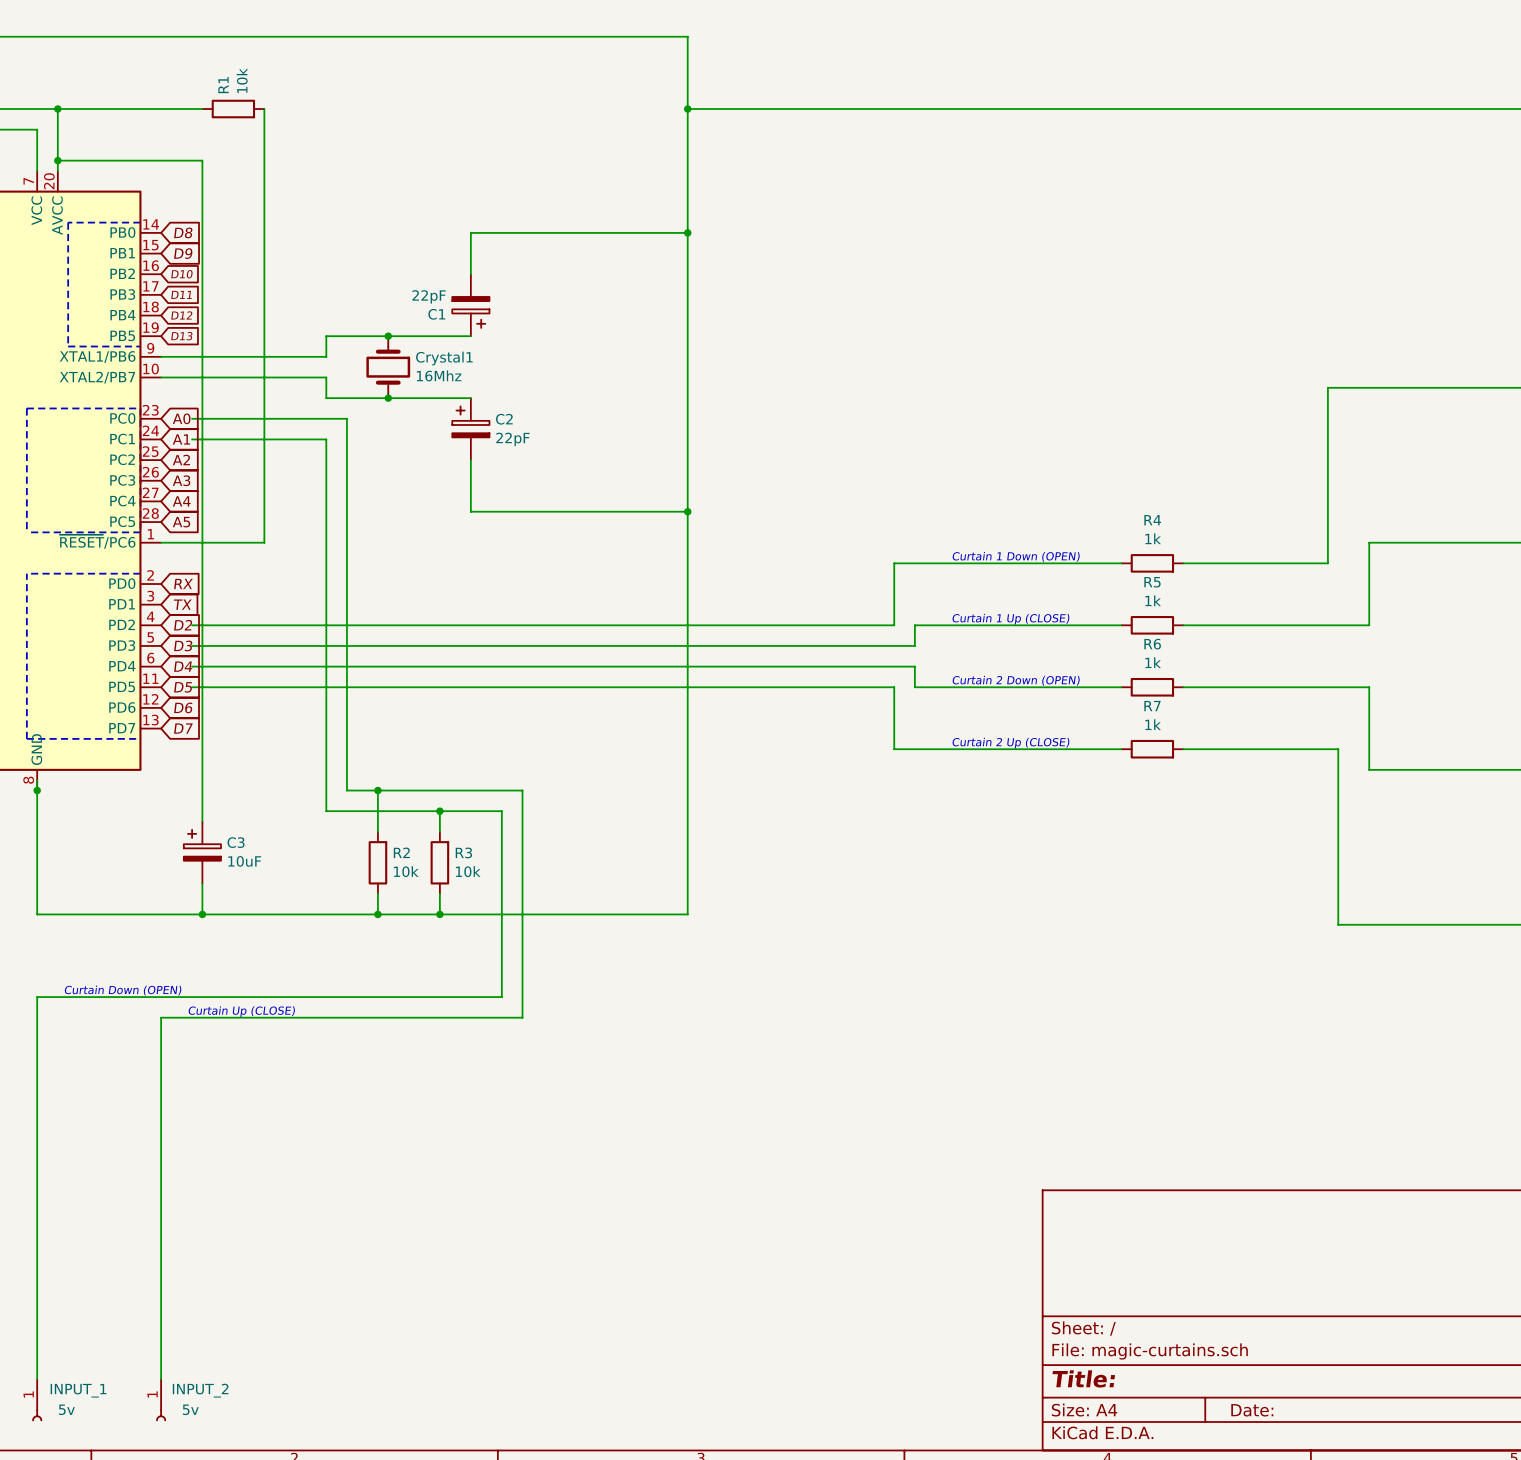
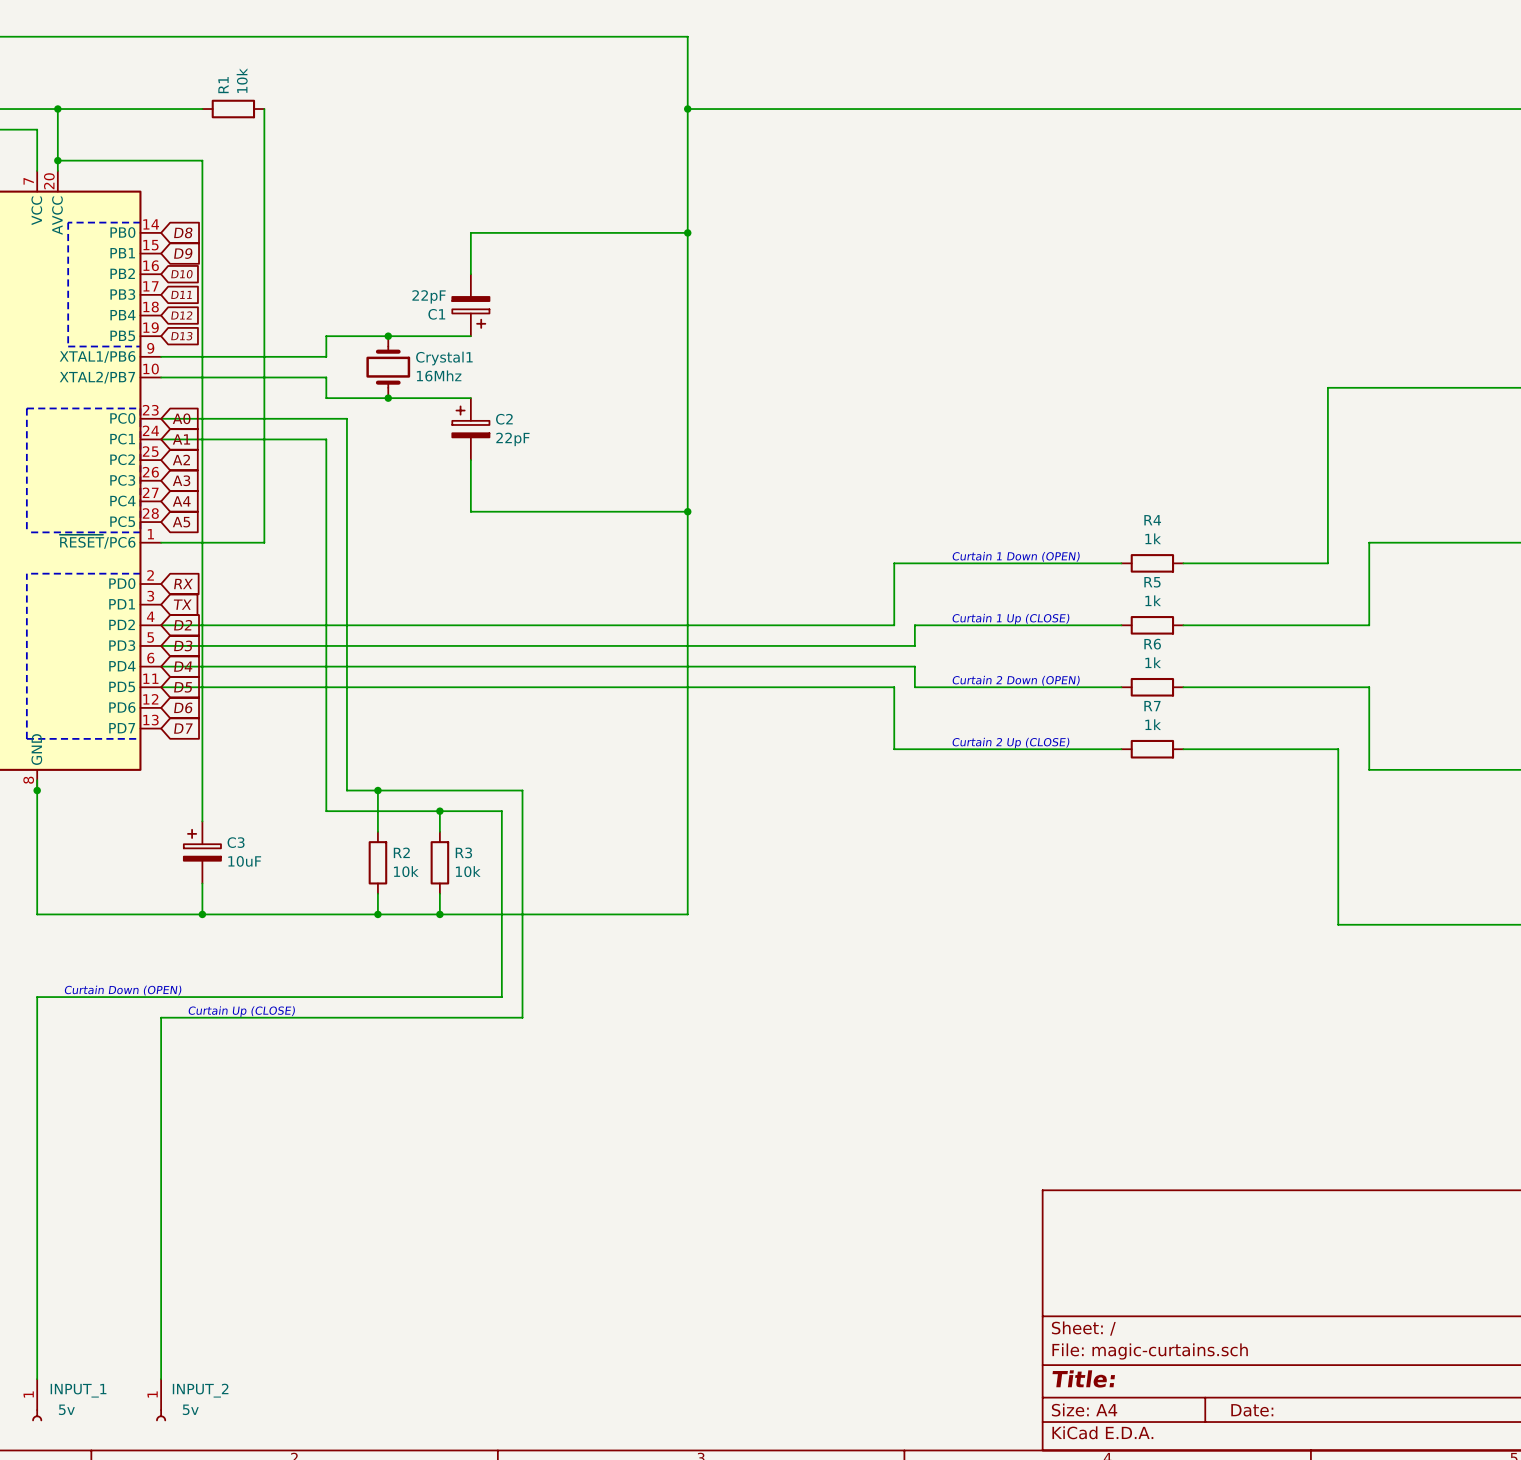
wire: none -> (161, 418) (192, 418)
wire: none -> (161, 439) (192, 439)
wire: none -> (161, 625) (192, 625)
wire: none -> (161, 645) (192, 645)
wire: none -> (161, 666) (192, 666)
wire: none -> (161, 687) (192, 687)

